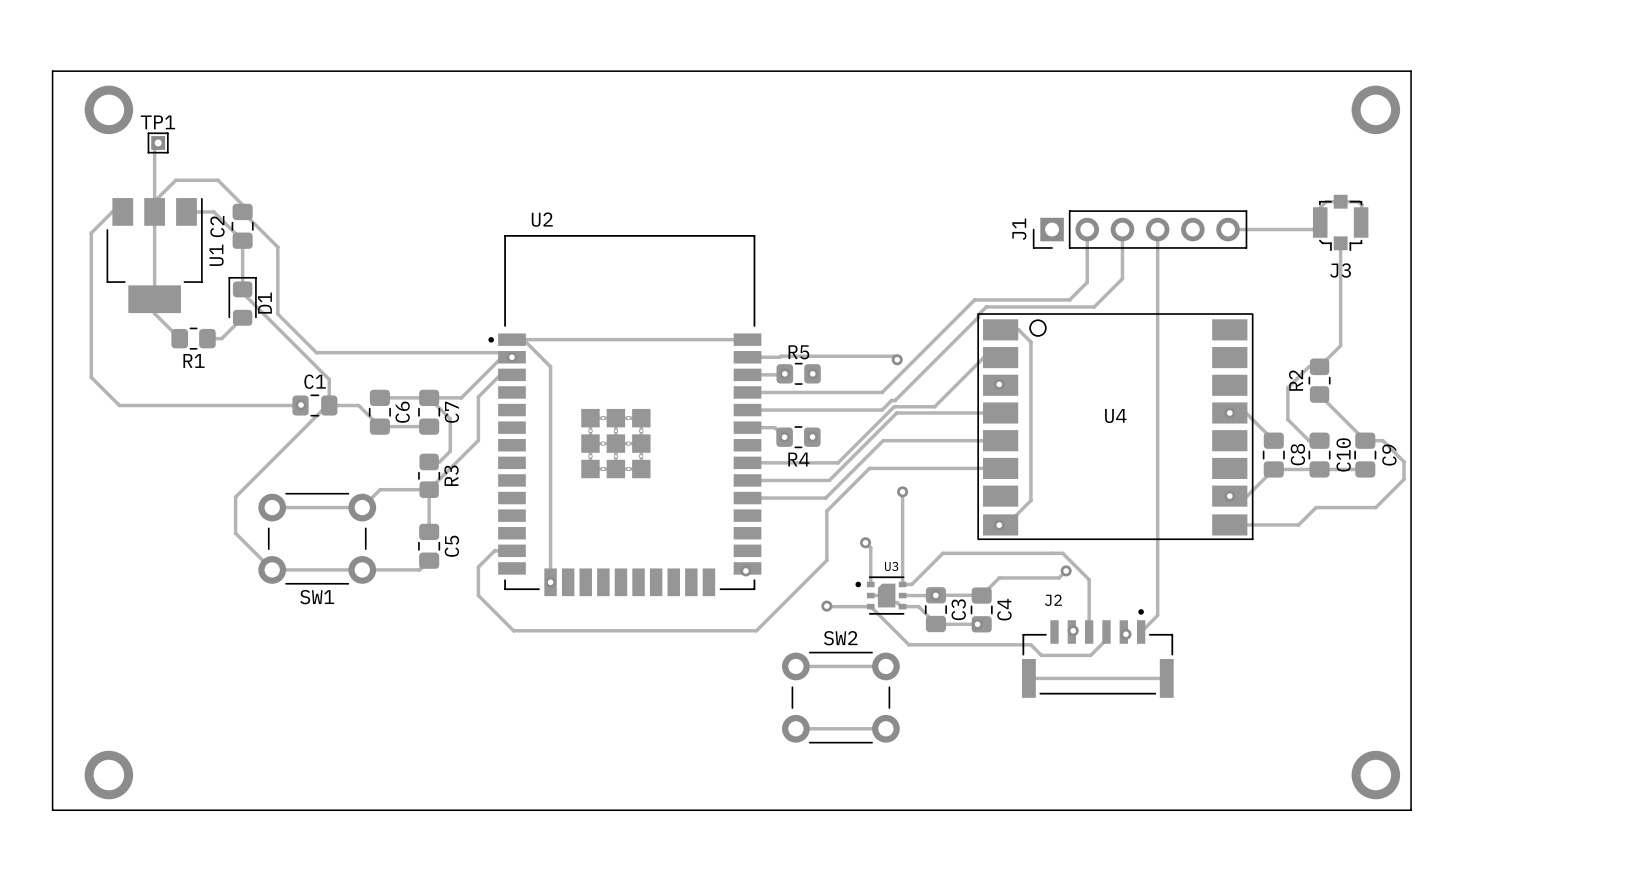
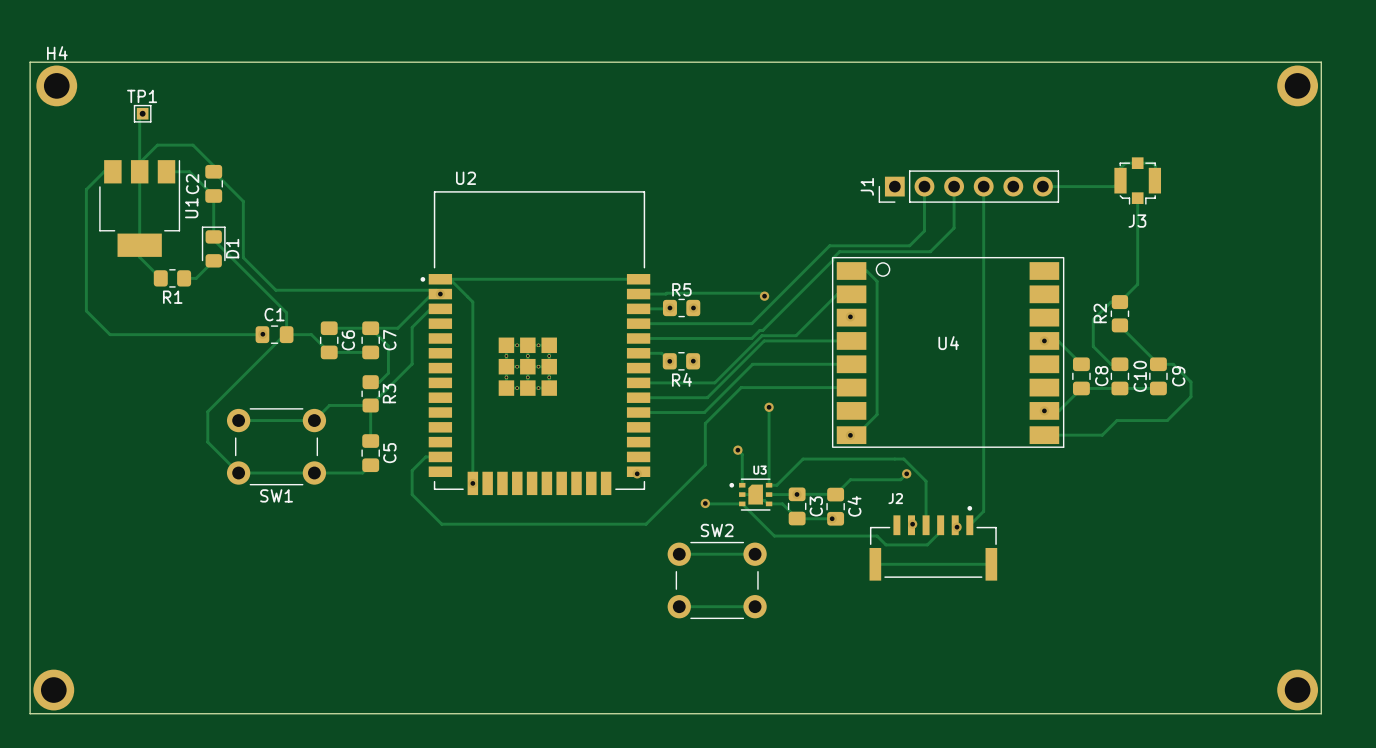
board edge: (52, 71) (1411, 71) (1411, 810) (52, 810) (52, 71) -> (30, 62) (30, 713) (1321, 713) (1321, 62) (30, 62)
H4: none -> (56, 85)
part: (108, 109) -> none
part position: (1375, 109) -> (1297, 85)
part position: (108, 775) -> (53, 690)
part position: (1375, 775) -> (1297, 690)

